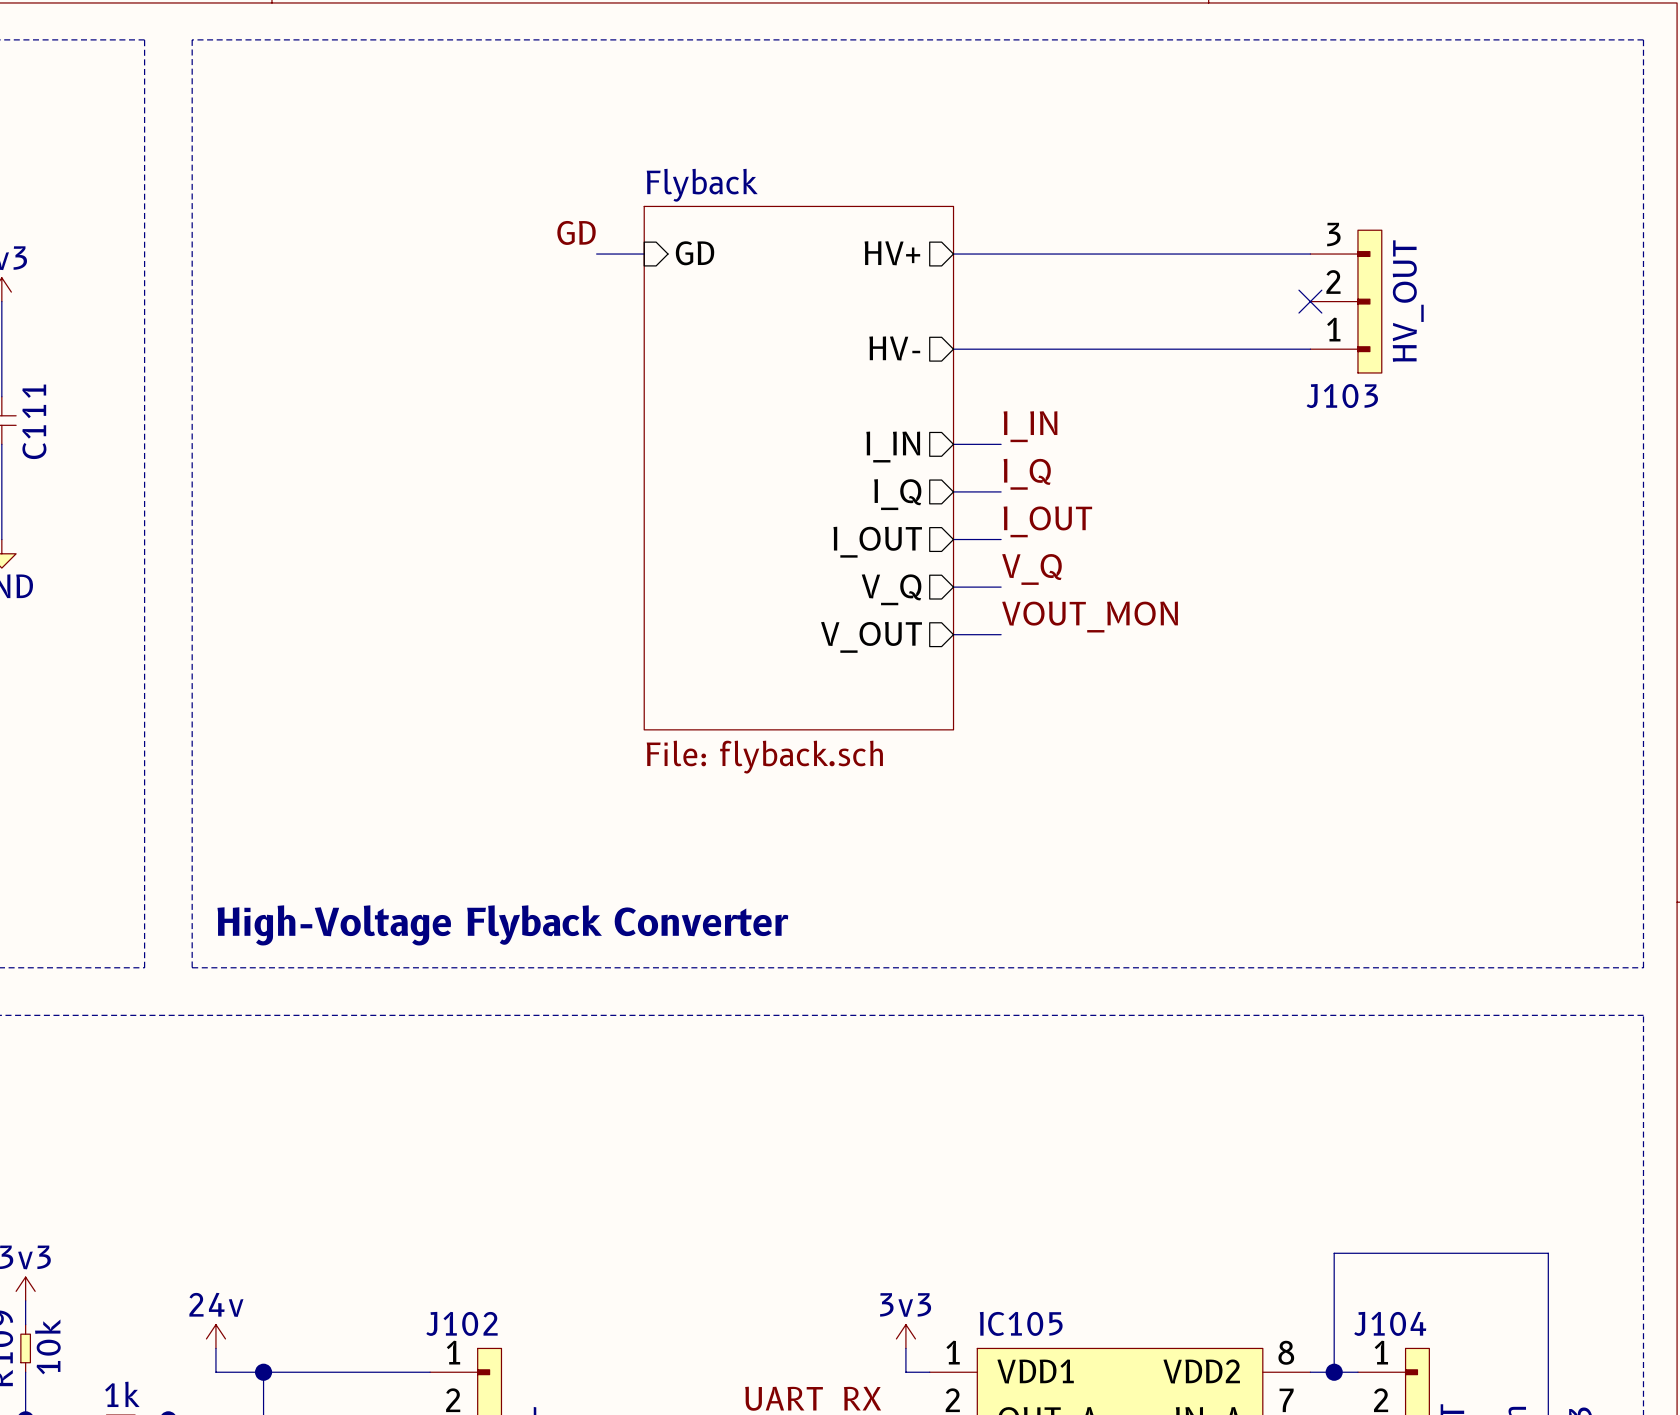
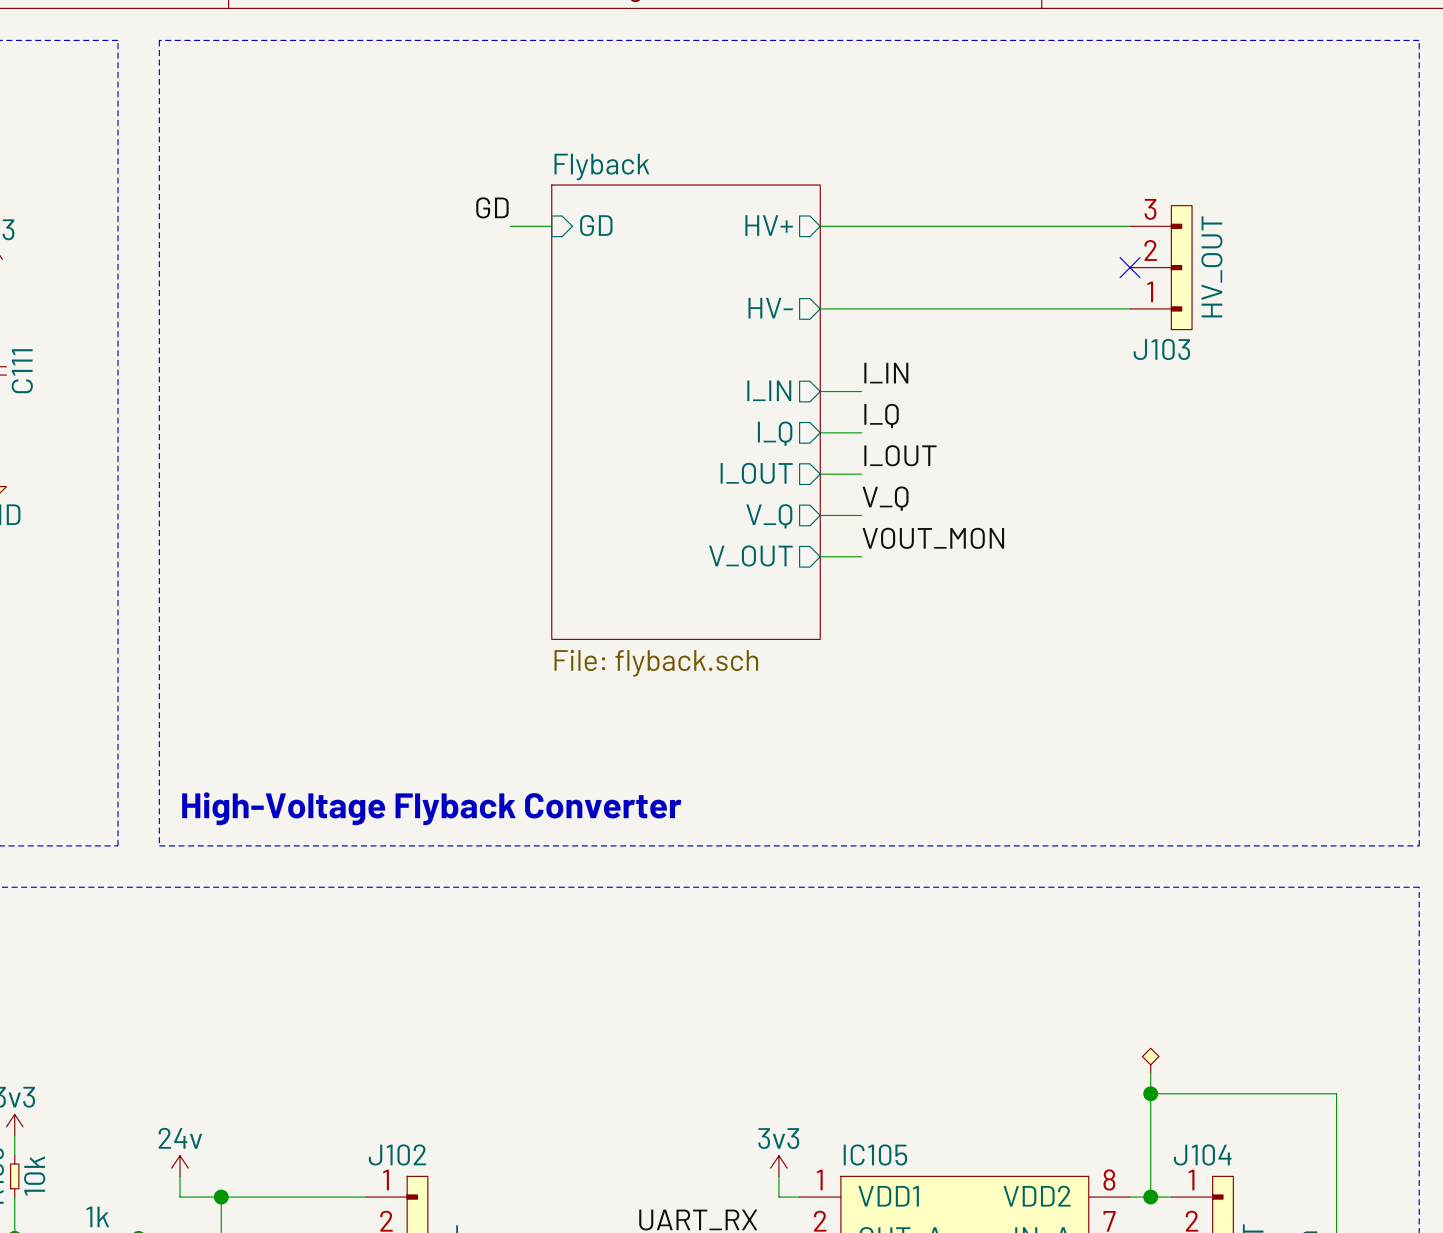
power symbol: none -> (1150, 1060)
wire: none -> (1150, 1073) (1150, 1093)
junction: none -> (1150, 1093)

